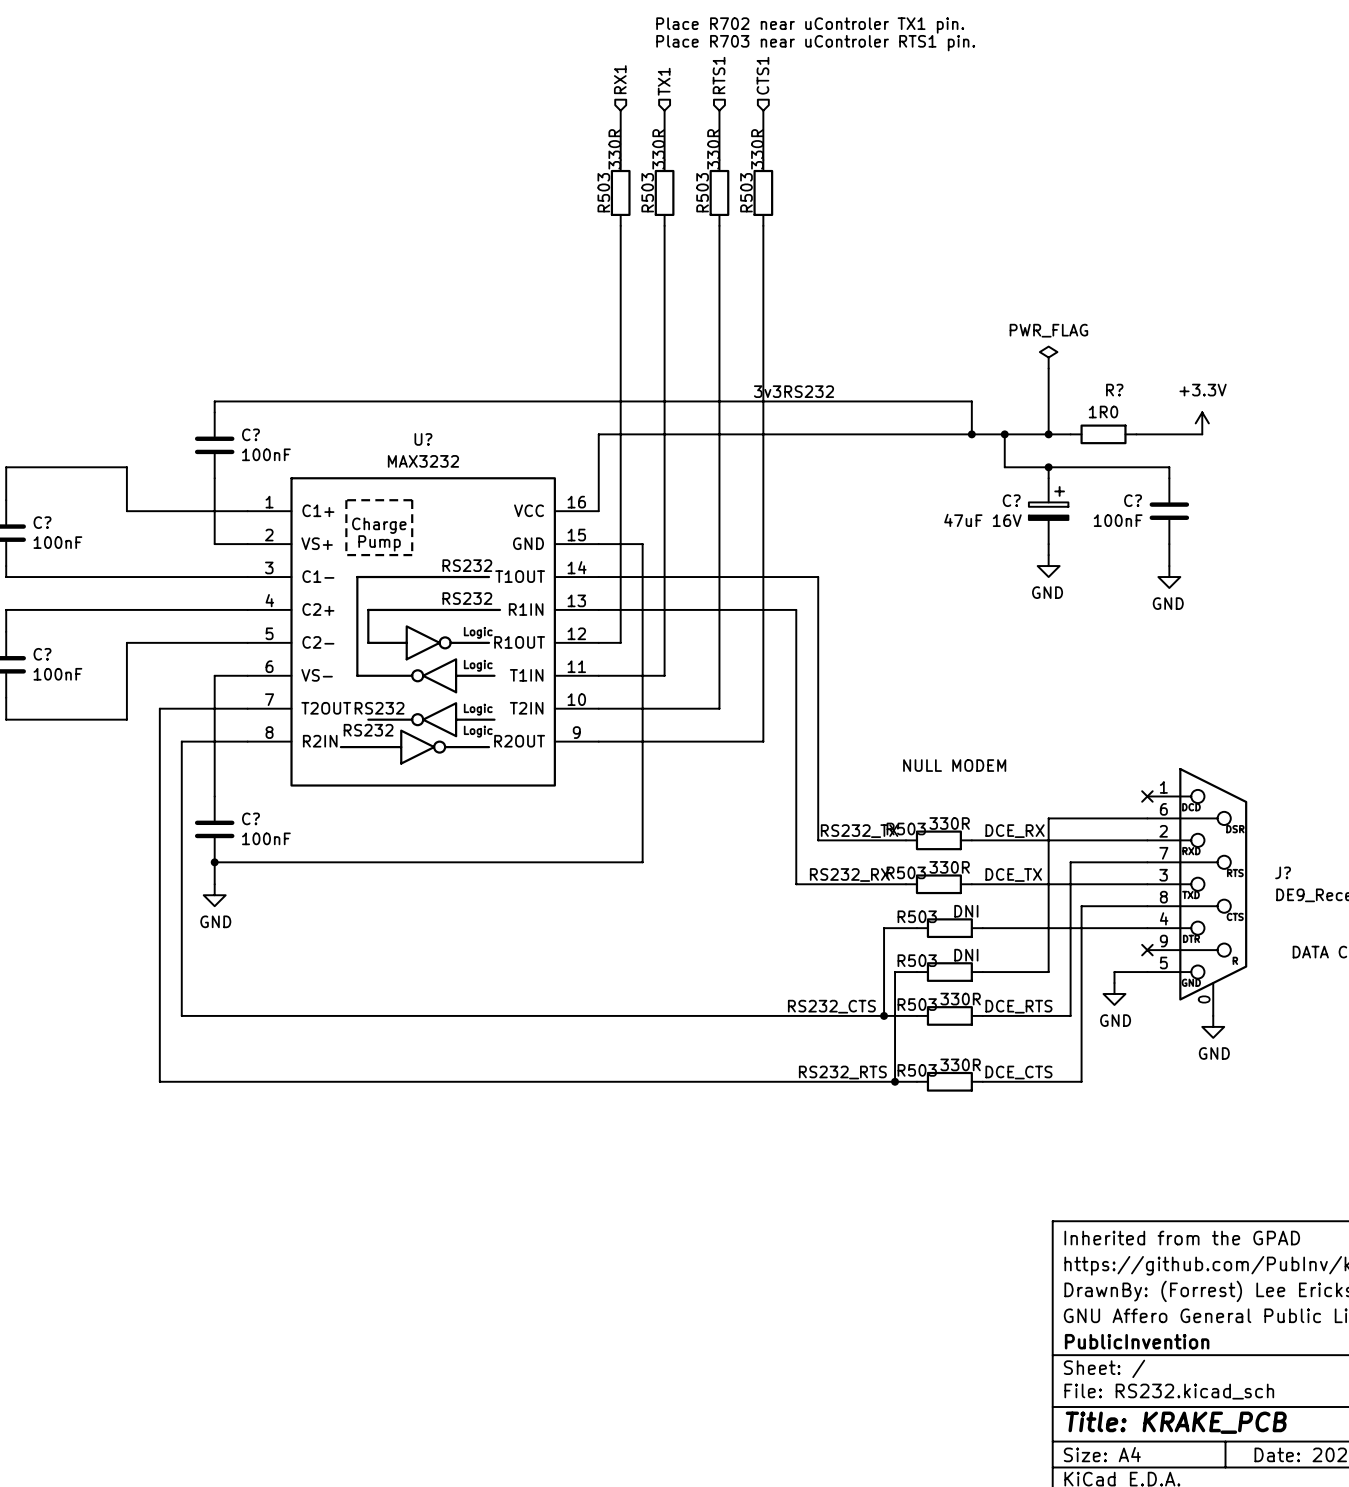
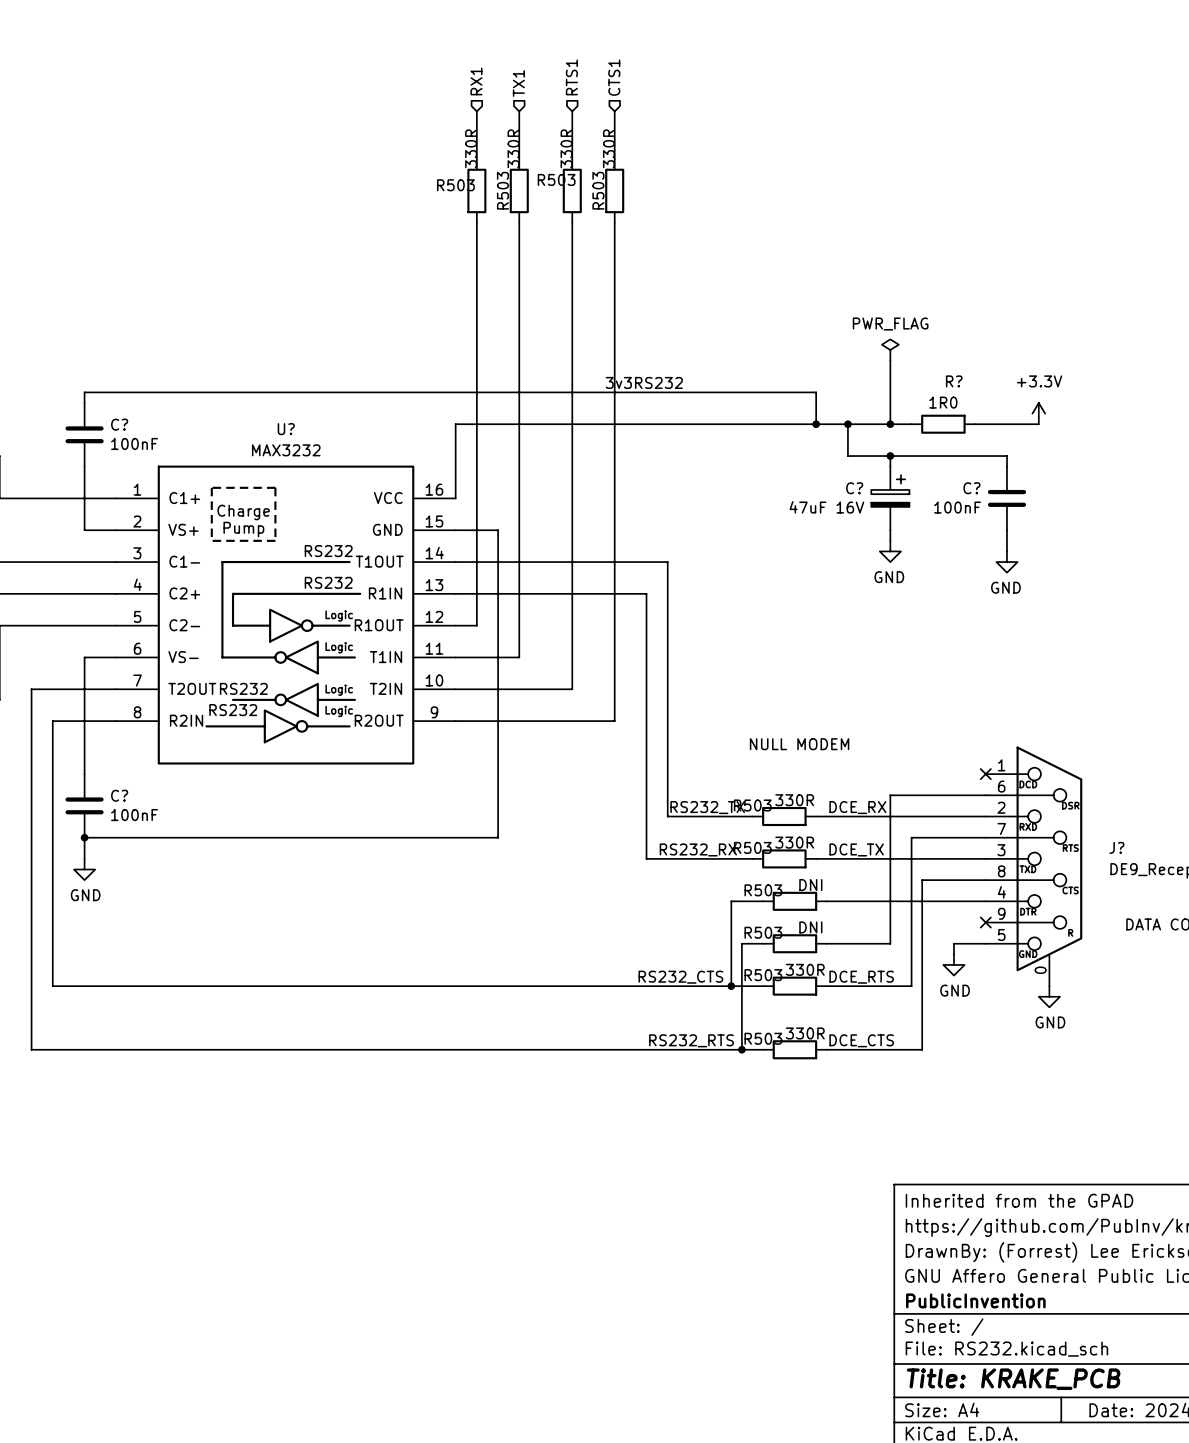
text: Place R702 near uControler TX1 pin. (810, 25) -> none
text: Place R703 near uControler RTS1 pin. (815, 43) -> none
R503 name rotation: 0° (603, 192) -> 90° clockwise (455, 185)
R503 name rotation: 0° (702, 192) -> 90° clockwise (556, 179)

